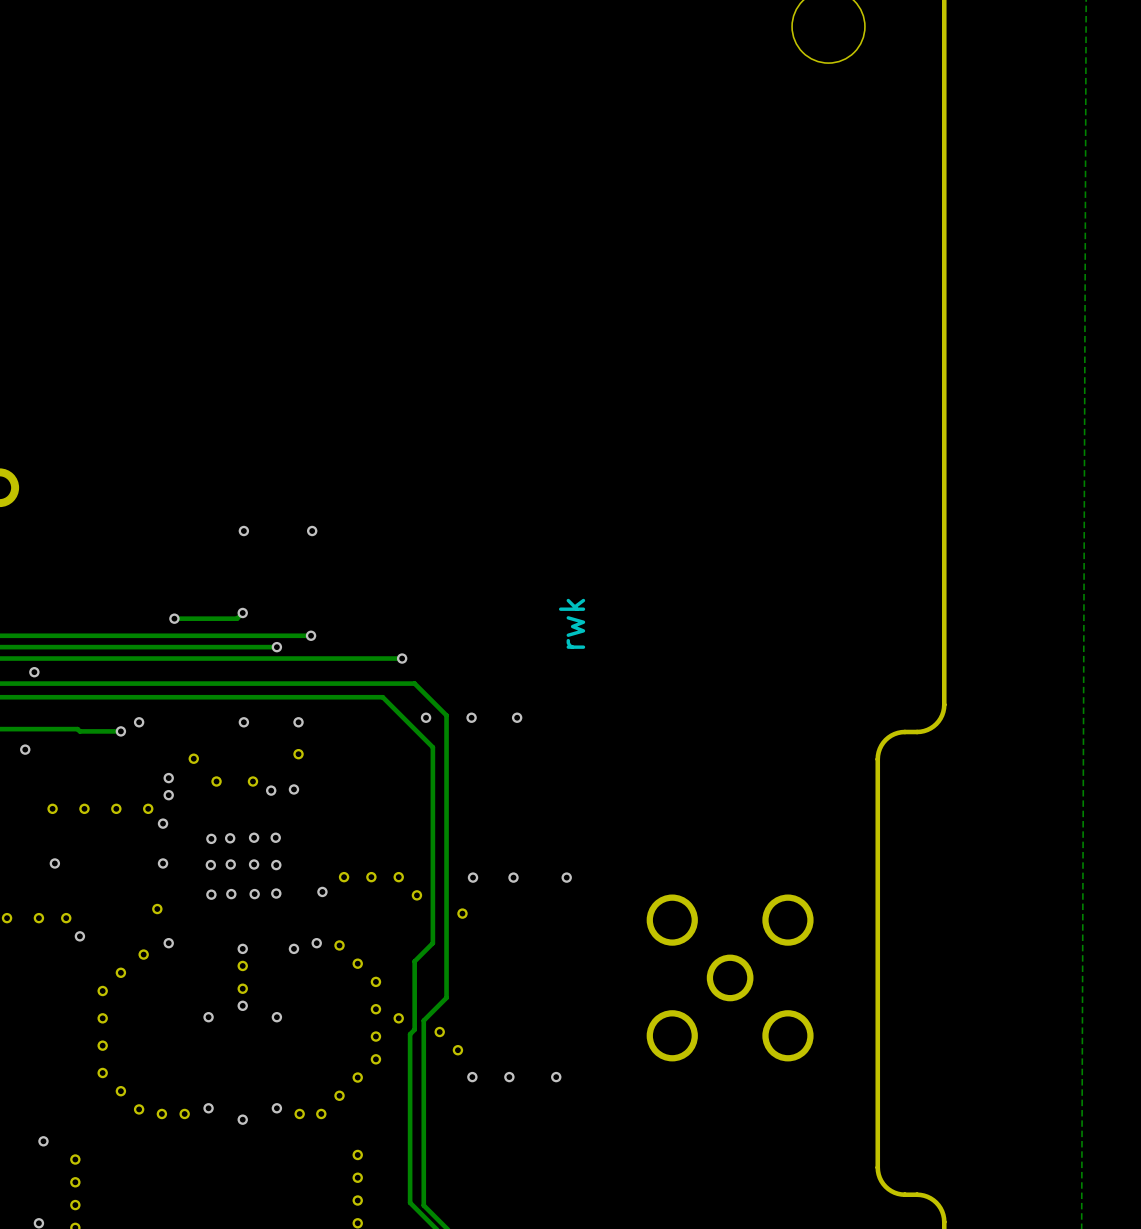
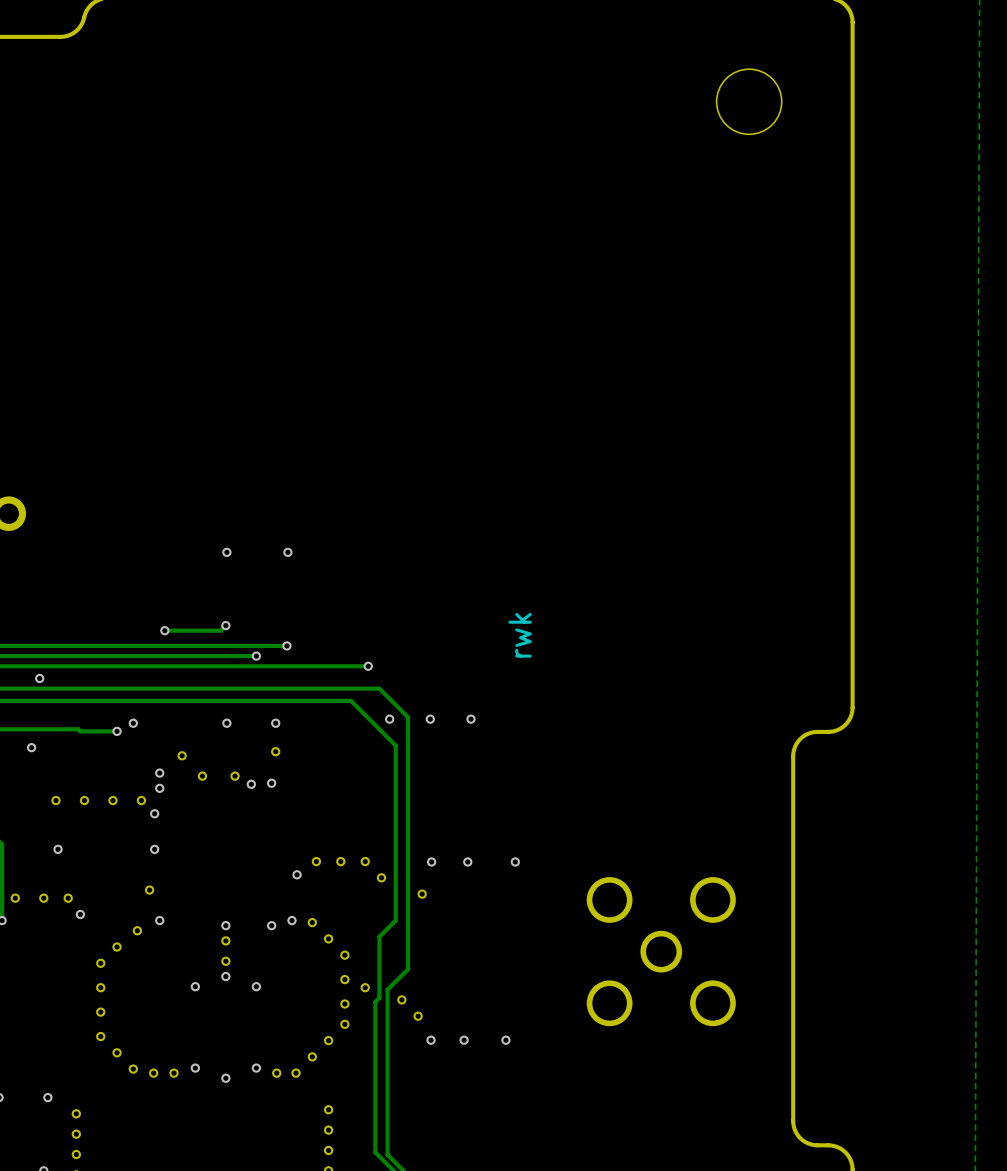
via: (254, 837) -> none
via: (275, 837) -> none
via: (211, 838) -> none
via: (230, 838) -> none
via: (230, 864) -> none
via: (254, 864) -> none
via: (210, 865) -> none
via: (276, 865) -> none
via: (276, 893) -> none
via: (211, 894) -> none
via: (231, 894) -> none
via: (254, 894) -> none

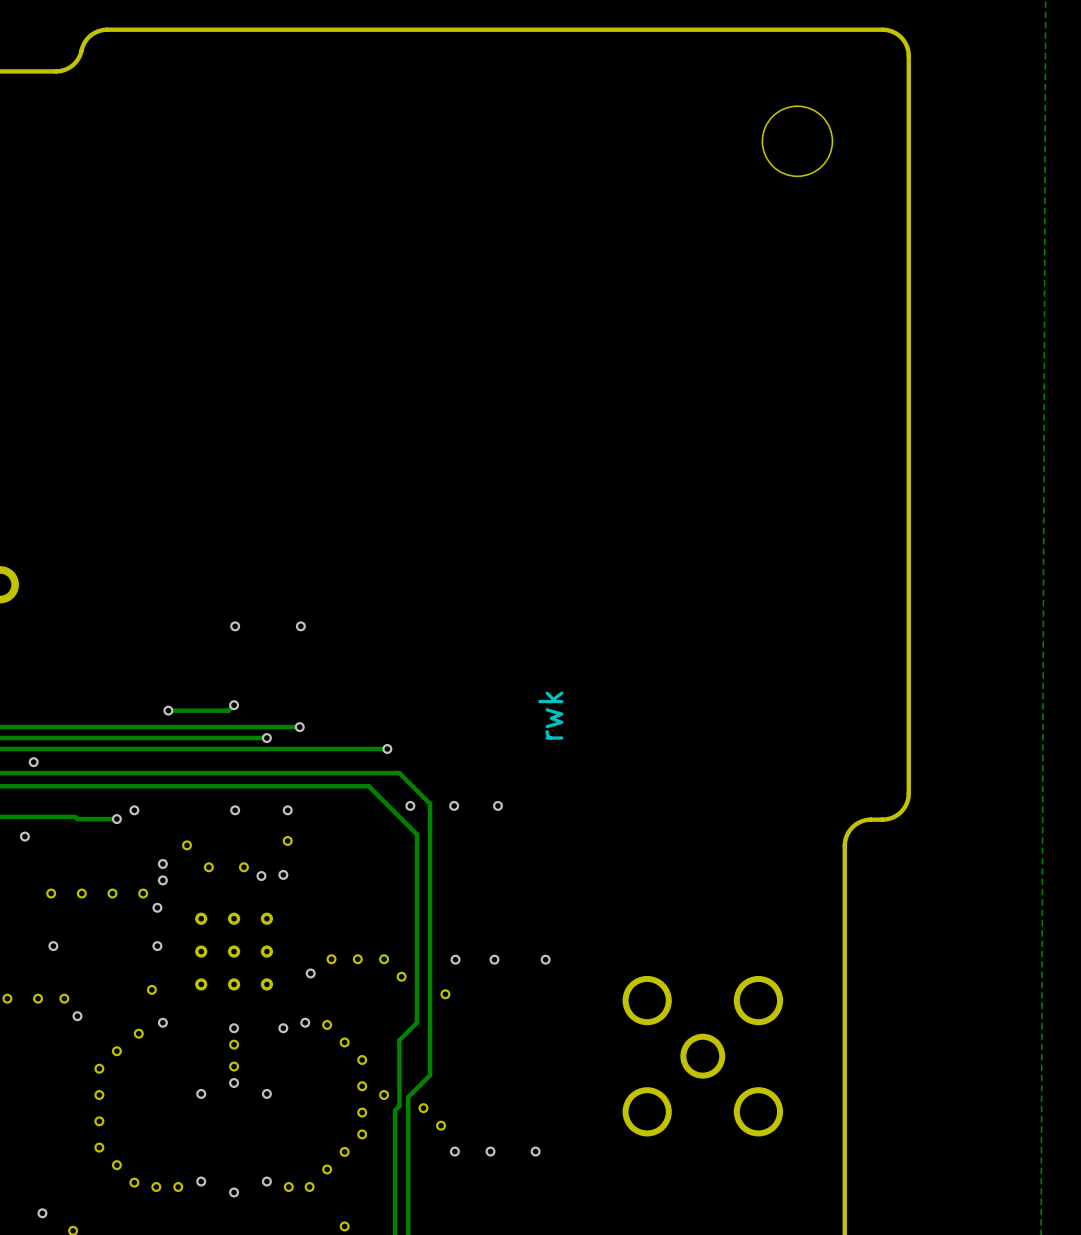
part: none -> (234, 951)

